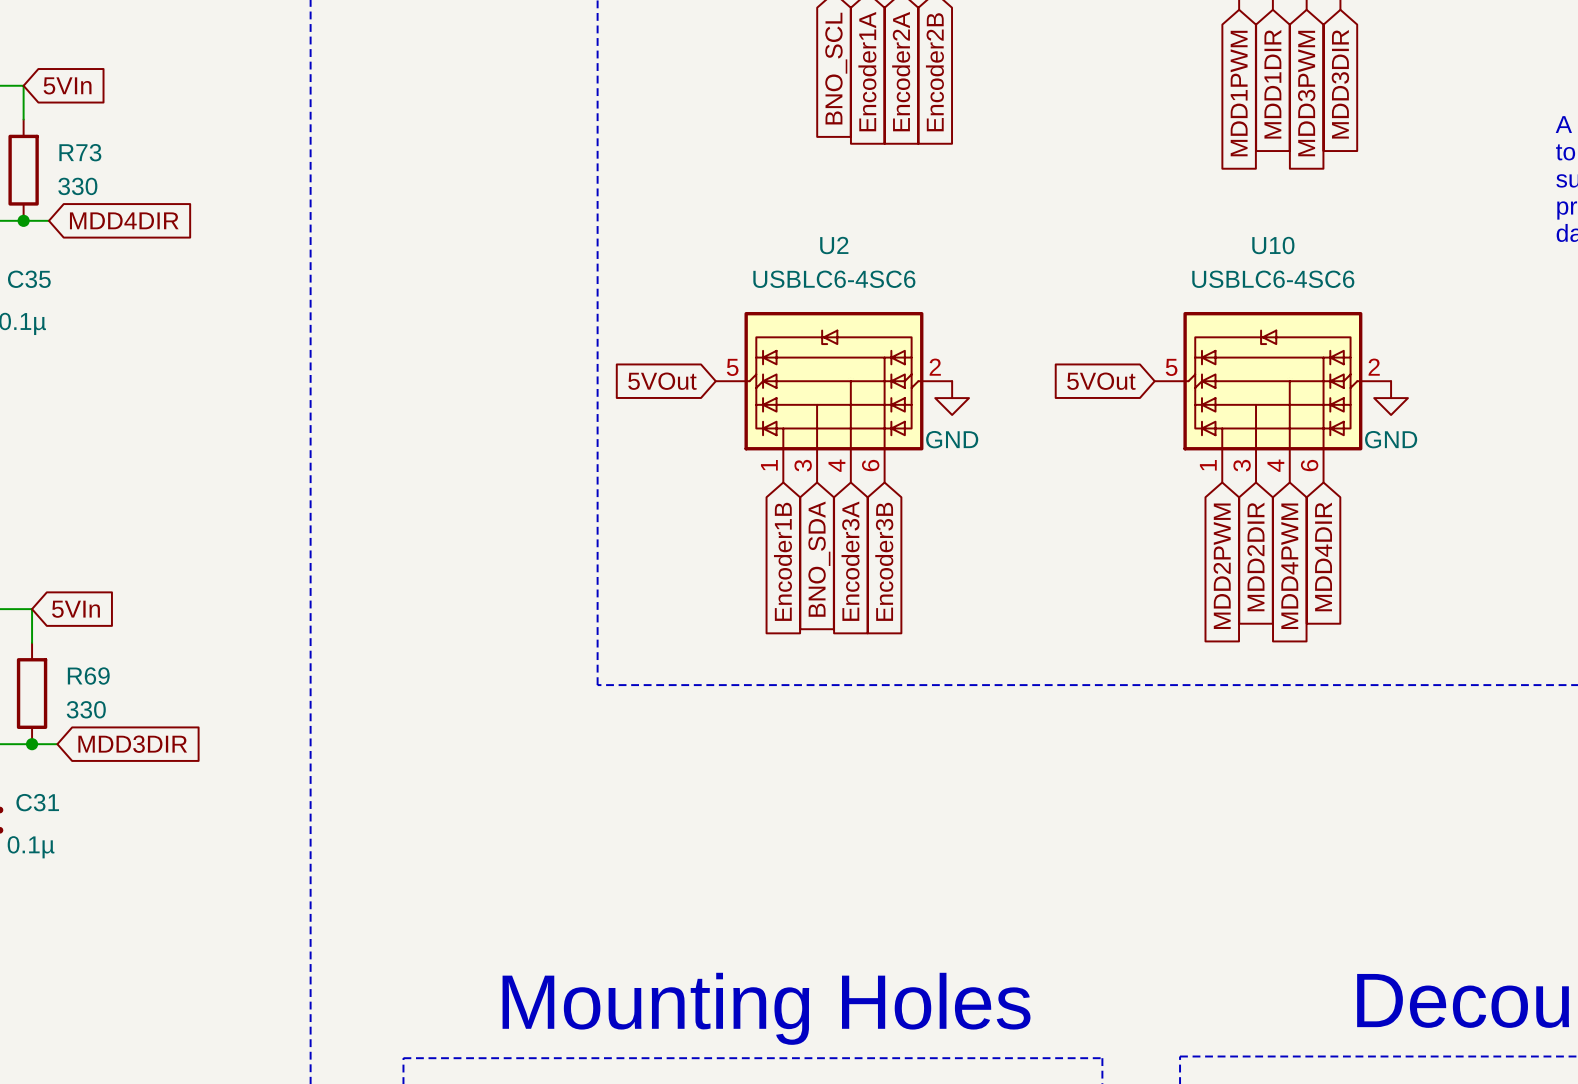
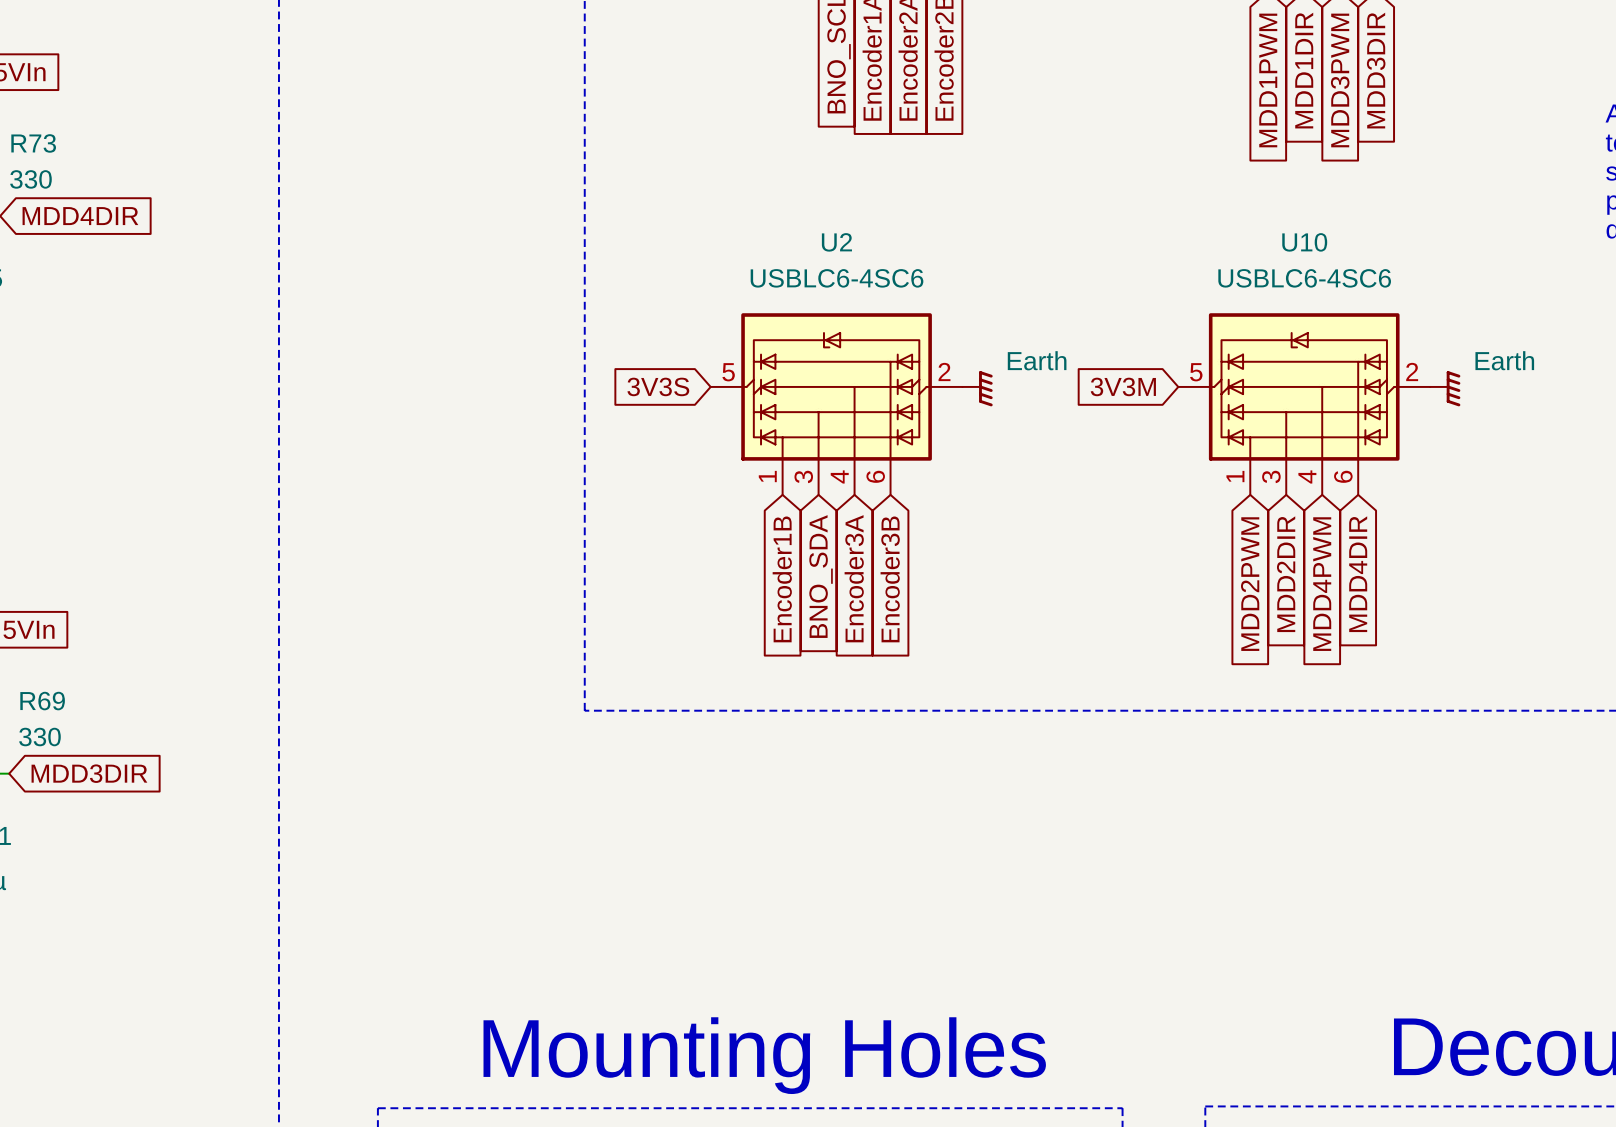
global label: 5VOut (662, 381) -> 3V3S (658, 386)
global label: 5VOut (1101, 381) -> 3V3M (1123, 386)
power symbol: none -> Earth (977, 388)
power symbol: none -> Earth (1445, 388)
power symbol: GND (952, 398) -> none
power symbol: GND (1391, 398) -> none

